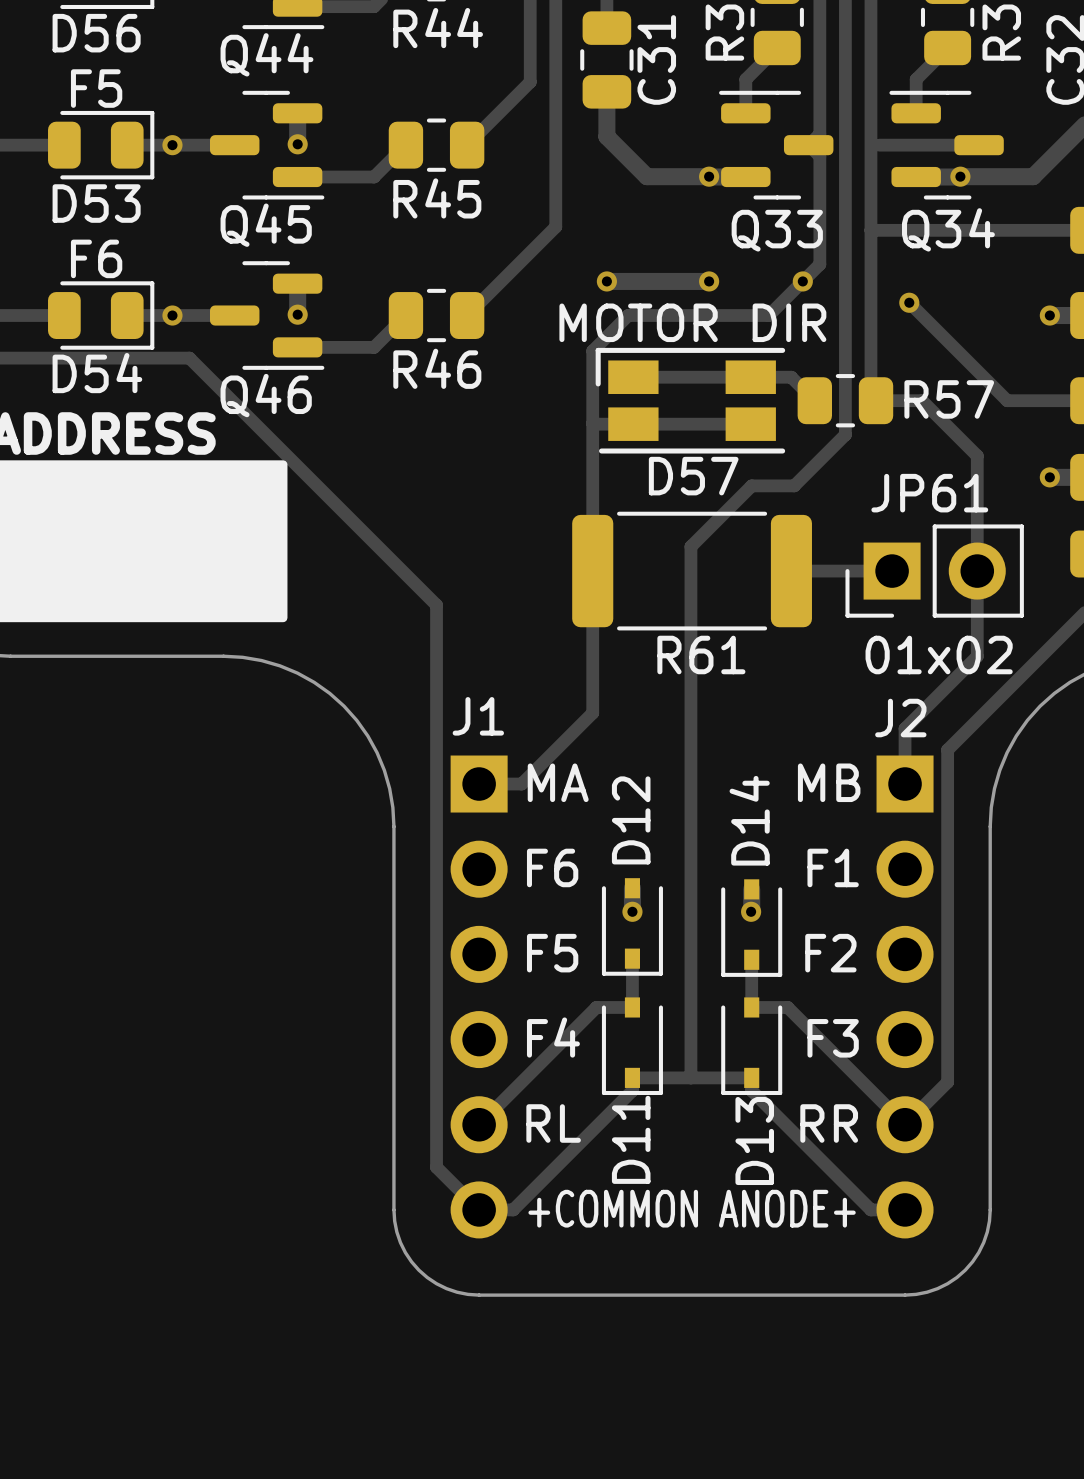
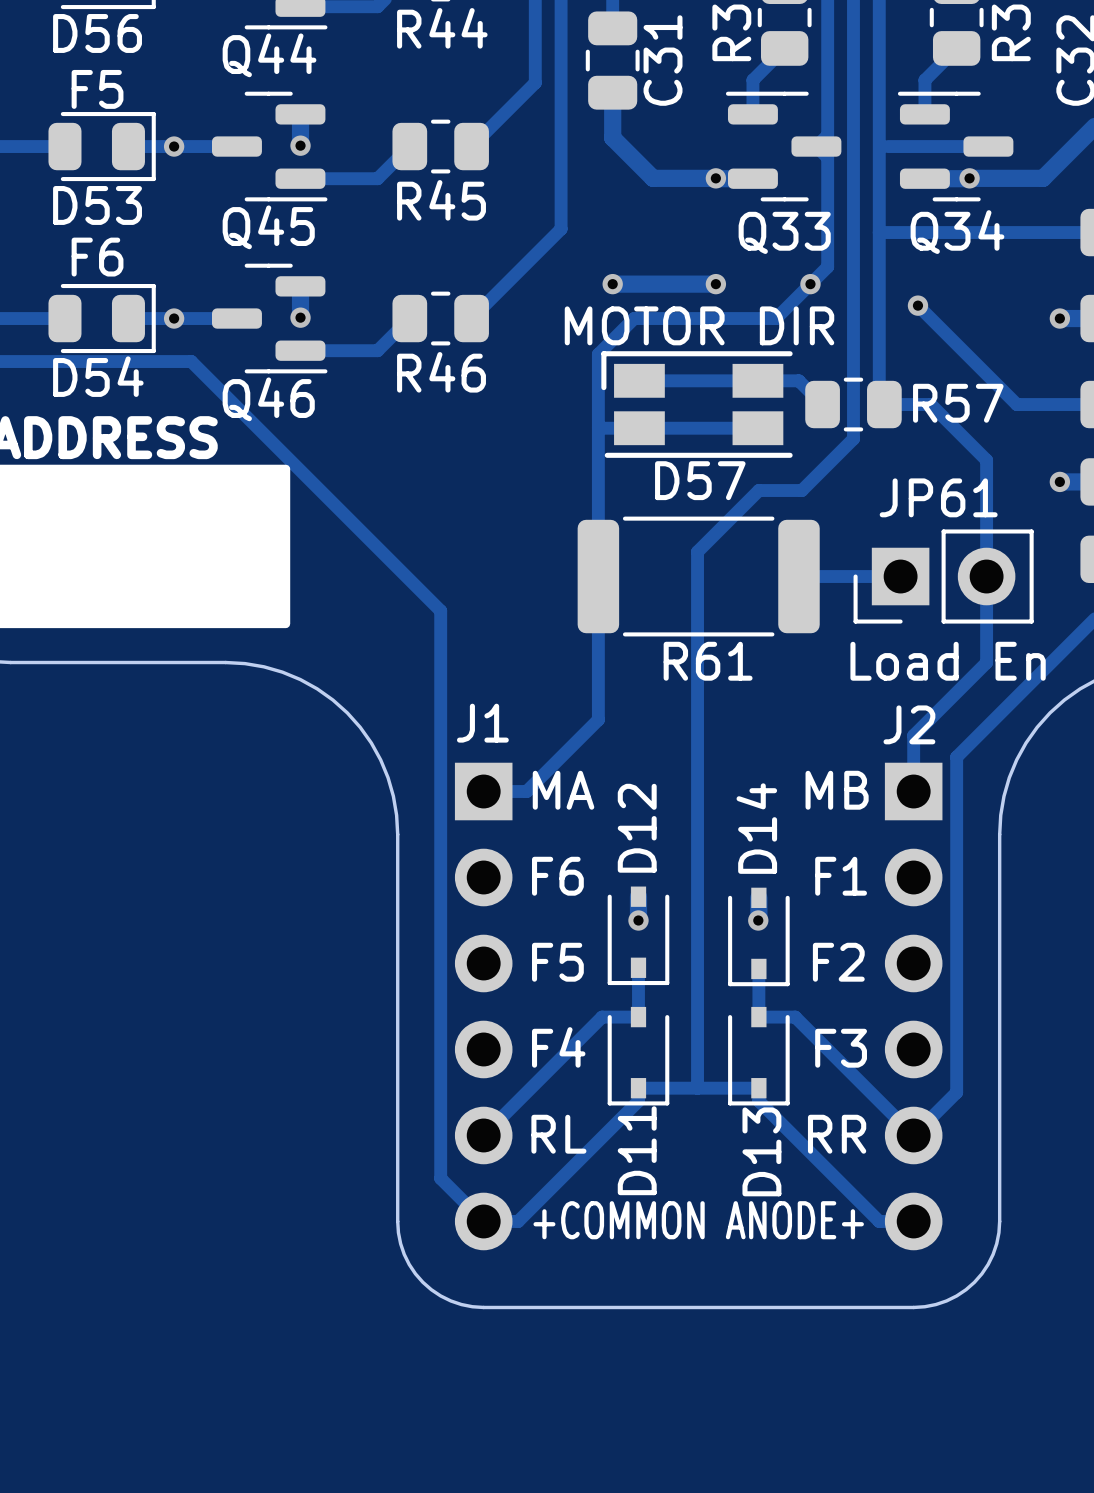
D54 value: none -> F6 (97, 257)
D54 text: F6 (96, 258) -> none
JP61 value: 01x02 (939, 654) -> Load En (948, 661)

